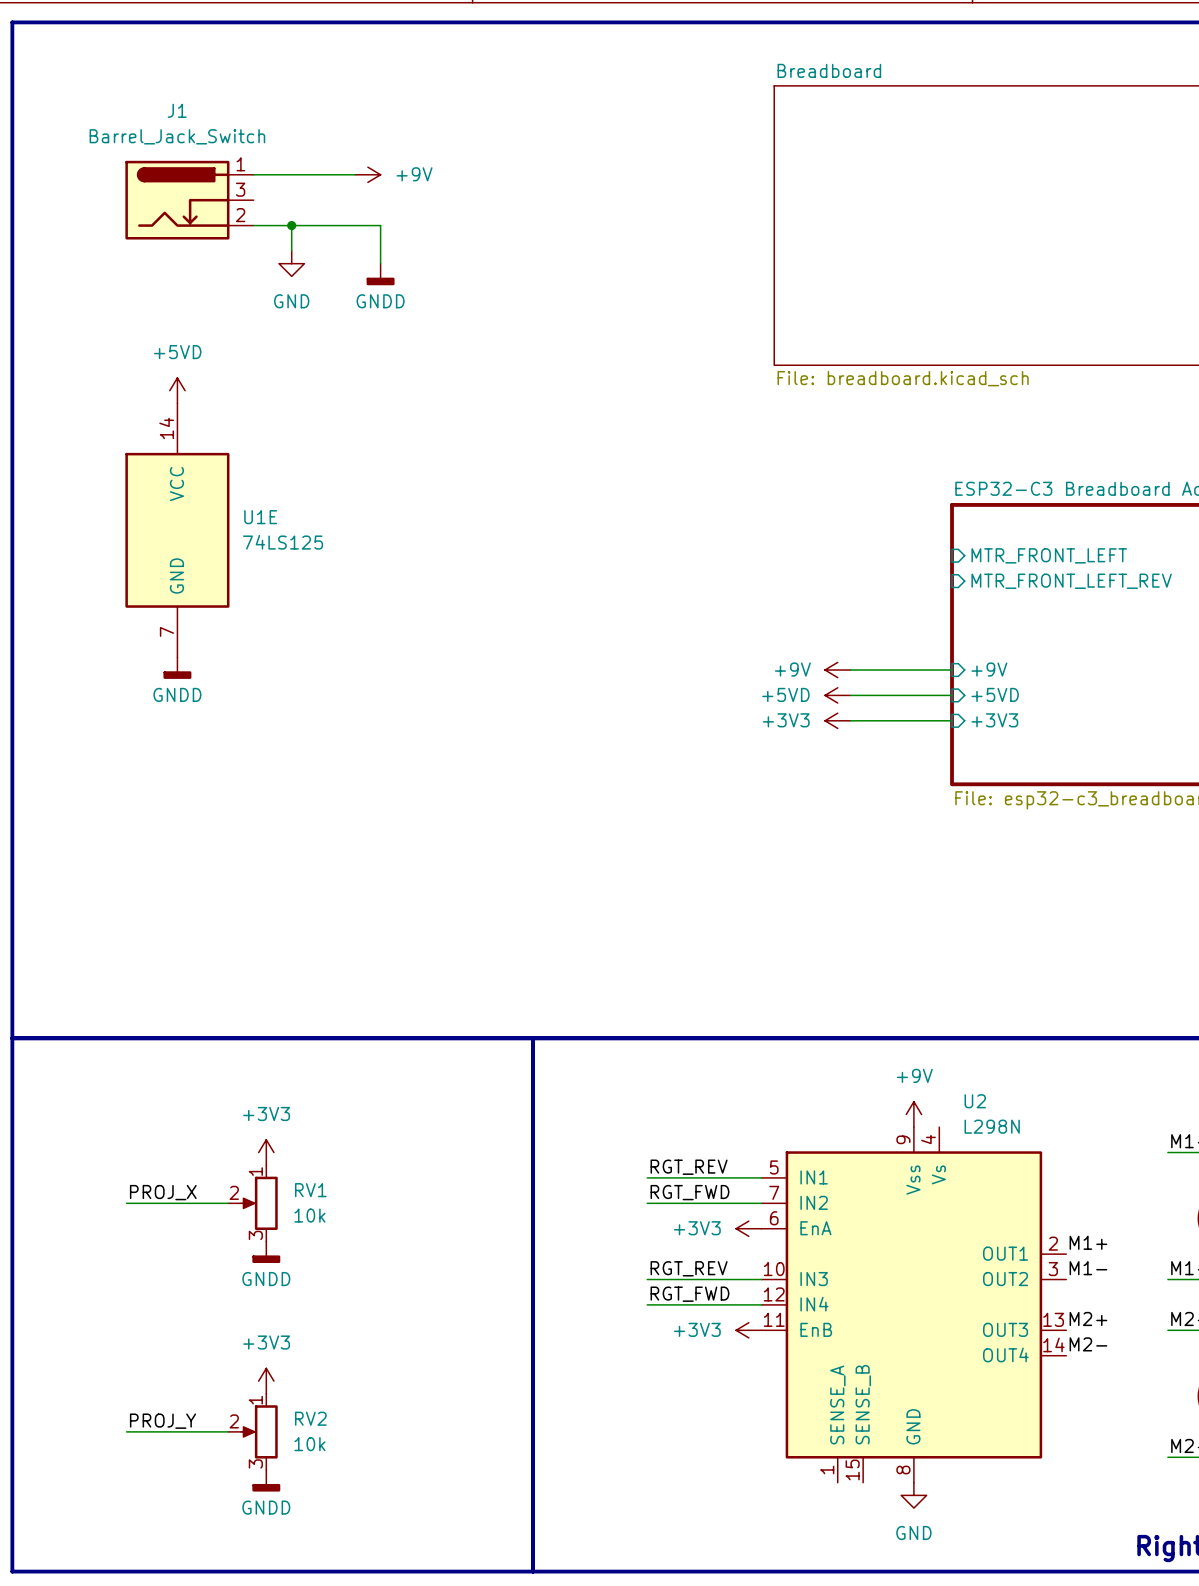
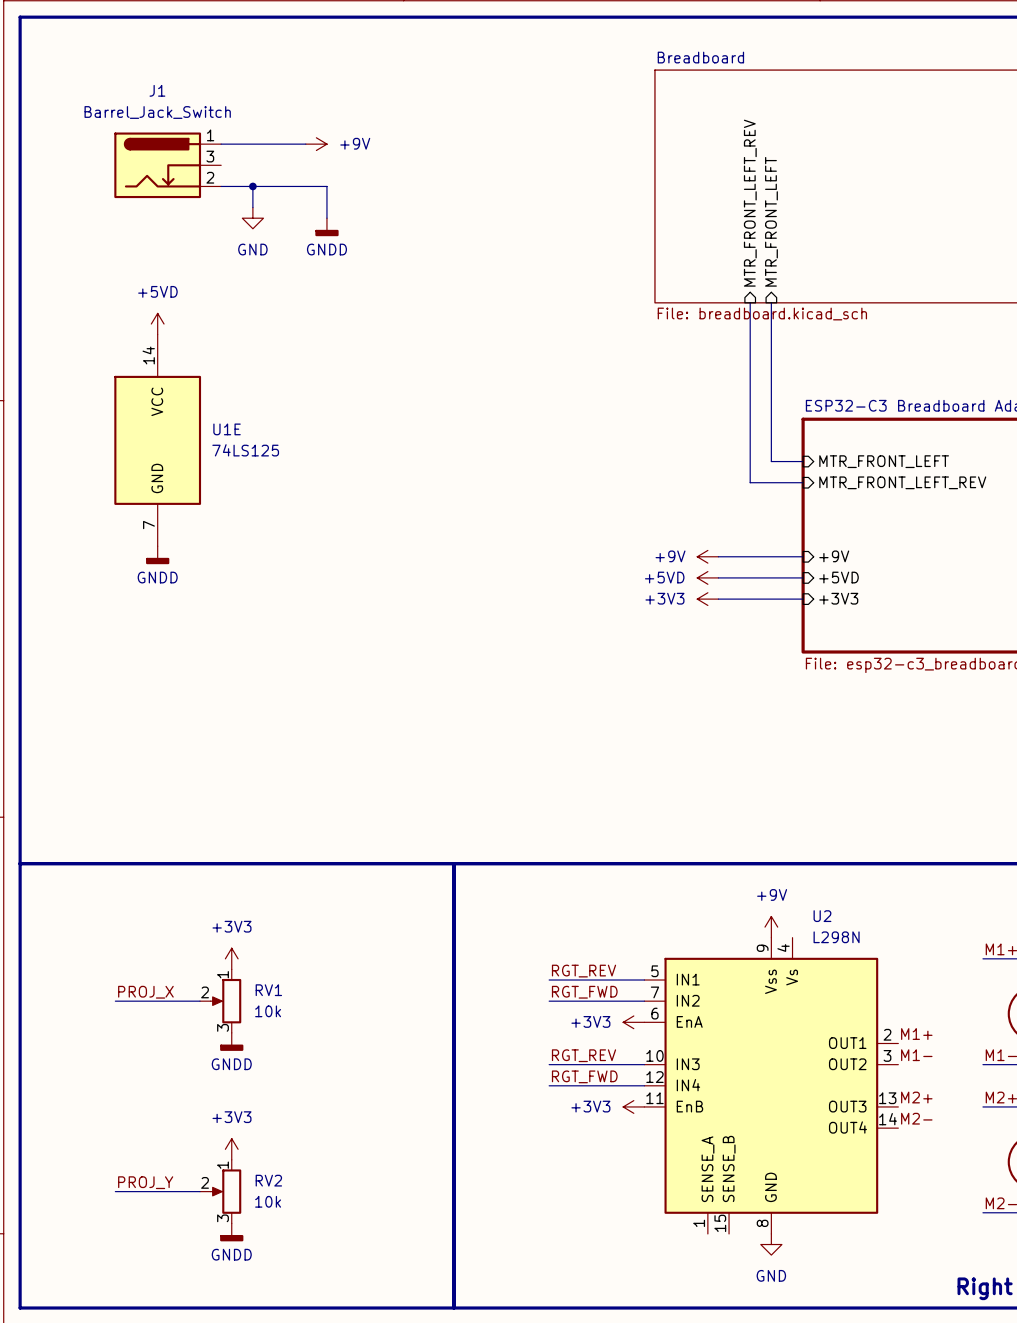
sheet pin: none -> MTR_FRONT_LEFT_REV (750, 203)
sheet pin: none -> MTR_FRONT_LEFT (771, 221)
wire: none -> (750, 302) (750, 482) (803, 482)
wire: none -> (771, 302) (771, 461) (803, 461)

